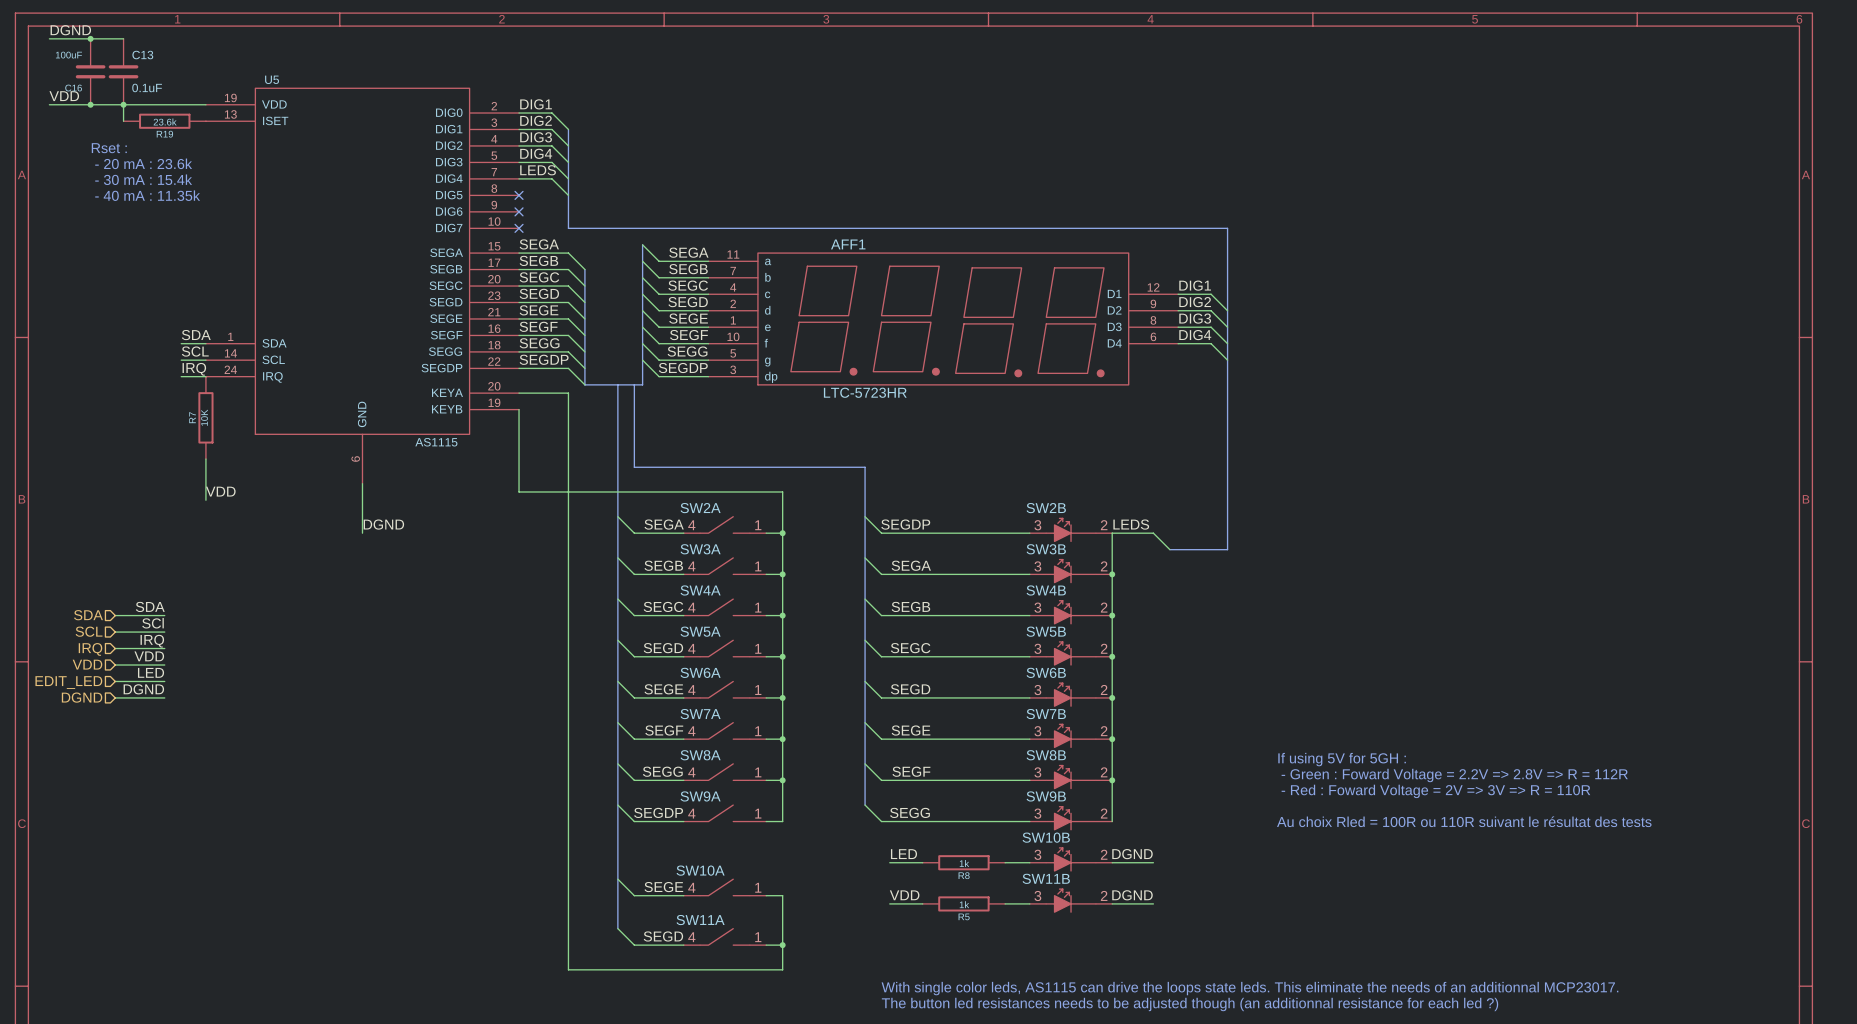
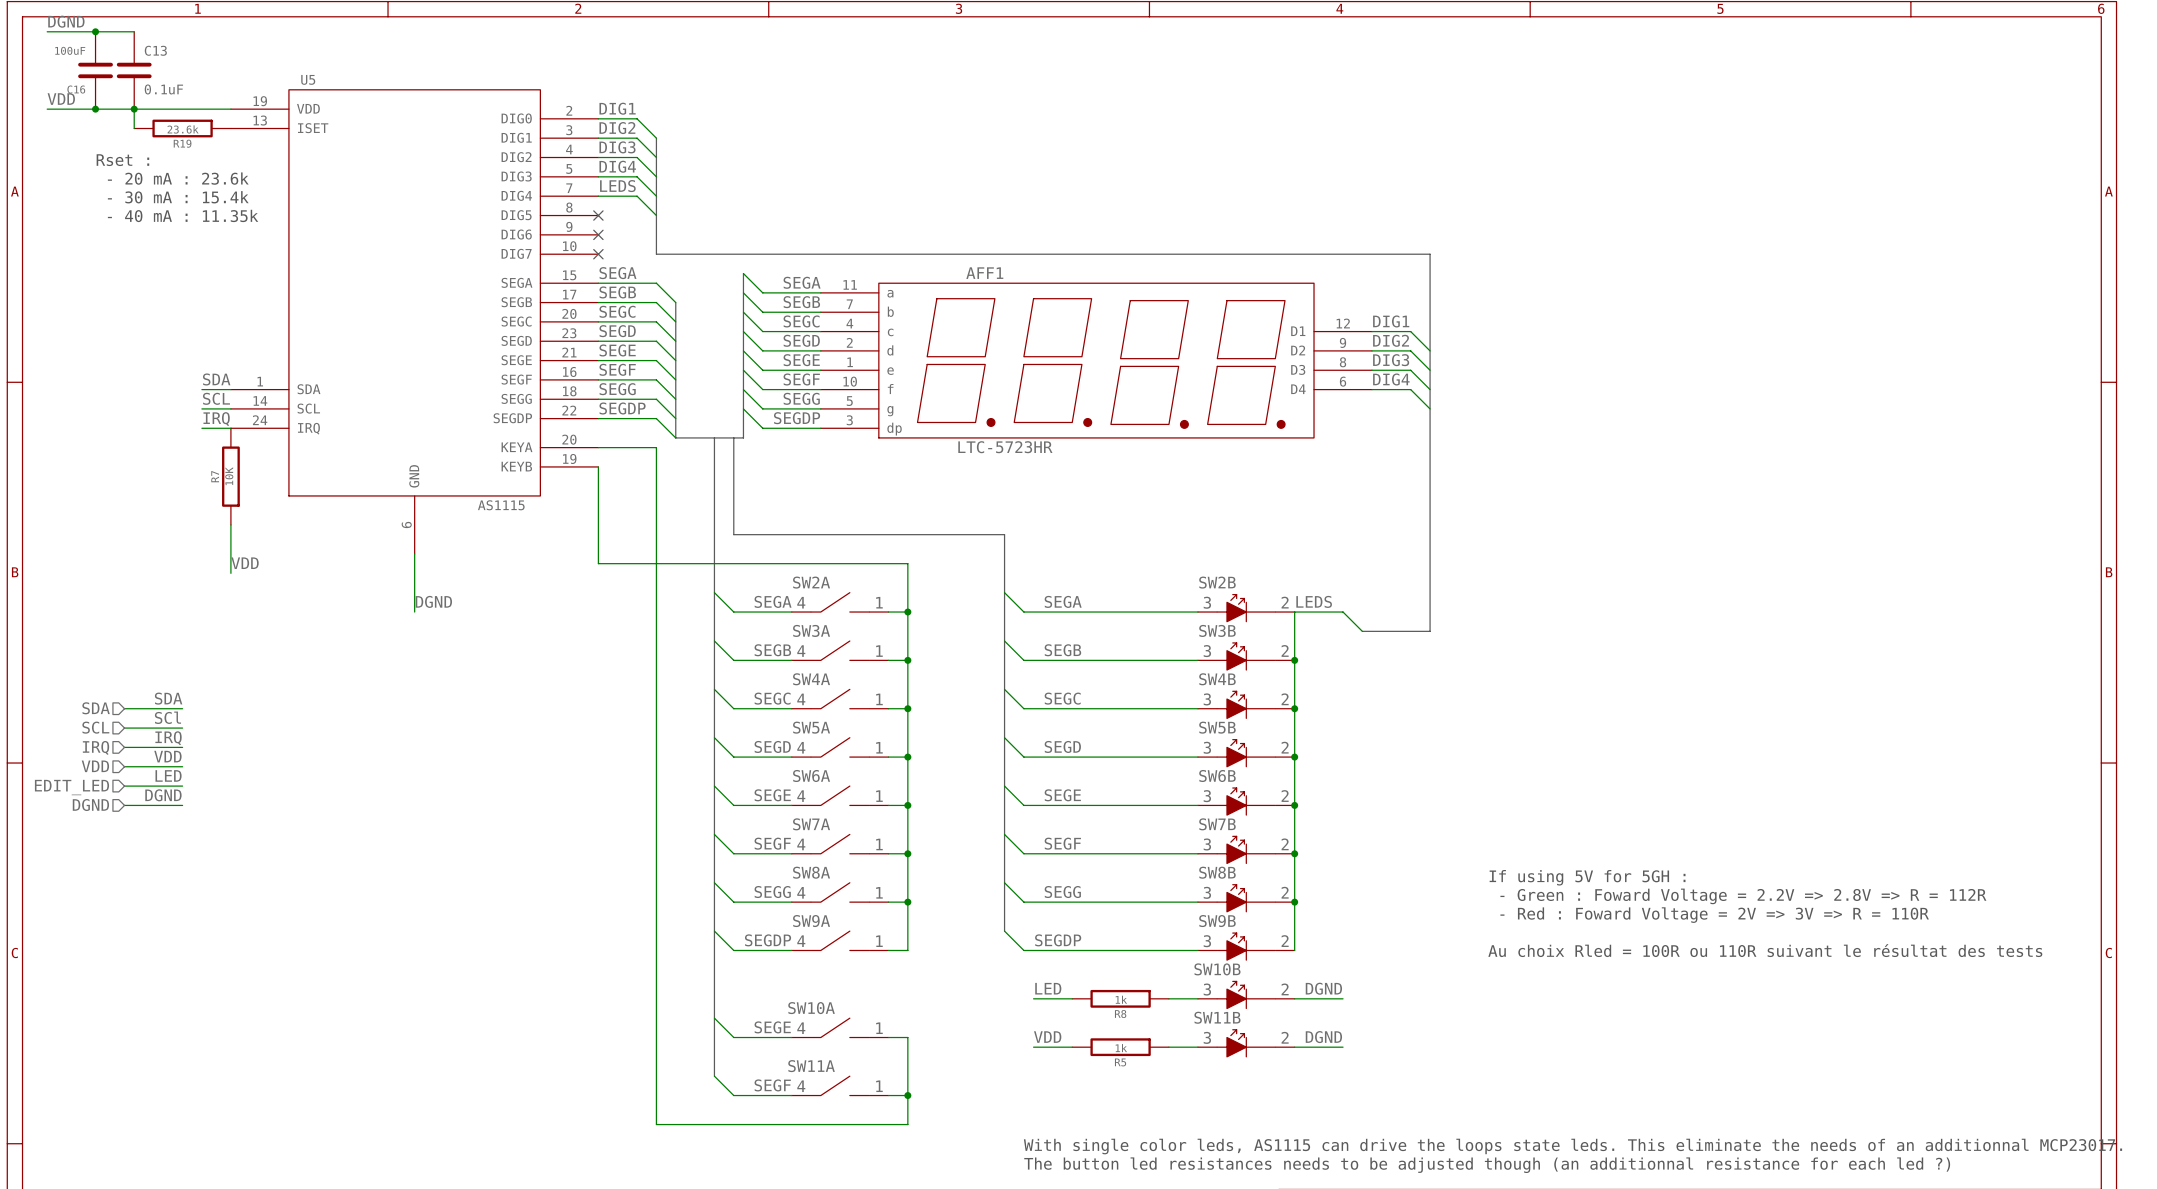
label: SEGDP (905, 524) -> SEGA (1063, 601)
label: SEGA (911, 565) -> SEGB (1062, 650)
label: SEGB (910, 606) -> SEGC (1062, 698)
label: SEGC (910, 648) -> SEGD (1062, 746)
label: SEGD (910, 689) -> SEGE (1062, 795)
label: SEGE (911, 730) -> SEGF (1062, 843)
label: SEGF (911, 771) -> SEGG (1062, 892)
label: SEGG (909, 812) -> SEGDP (1058, 940)
label: SEGD (663, 936) -> SEGF (772, 1085)

